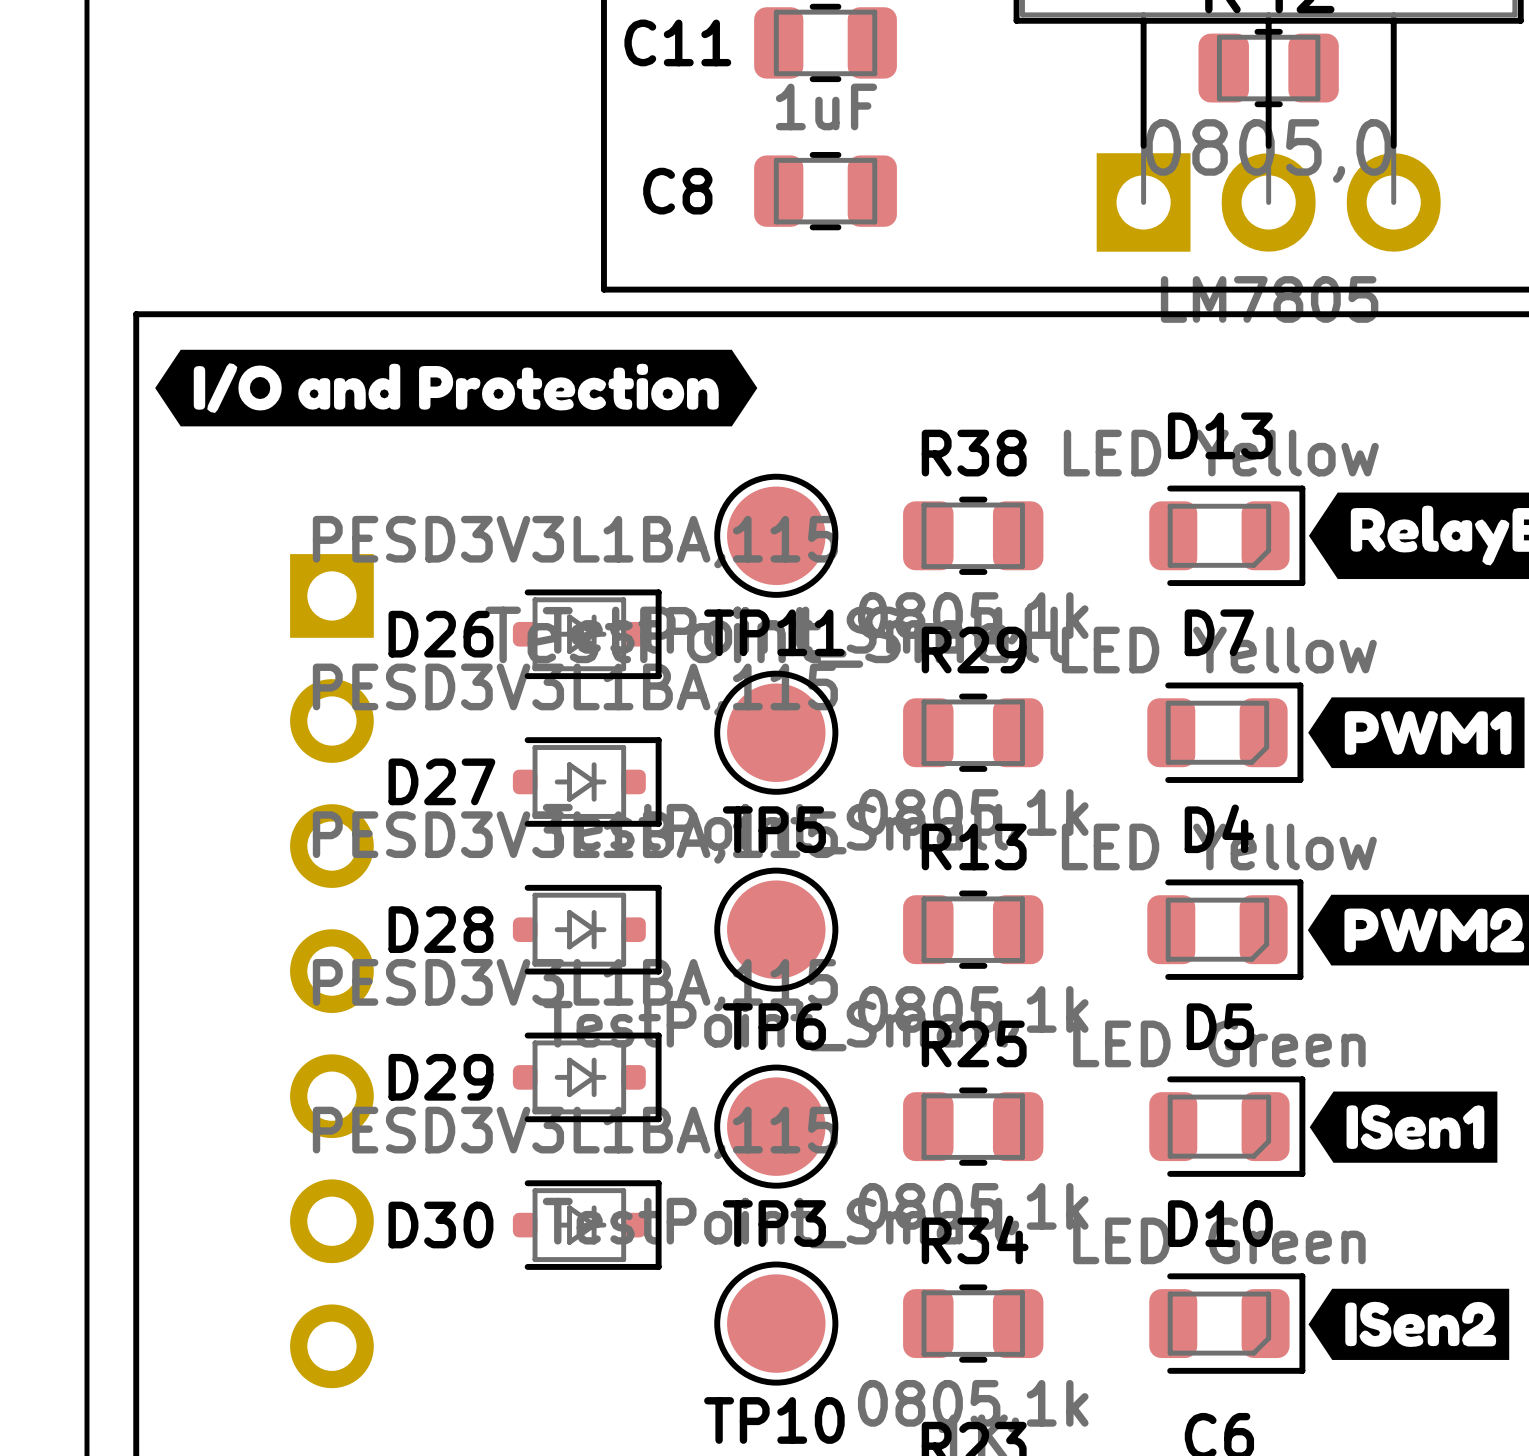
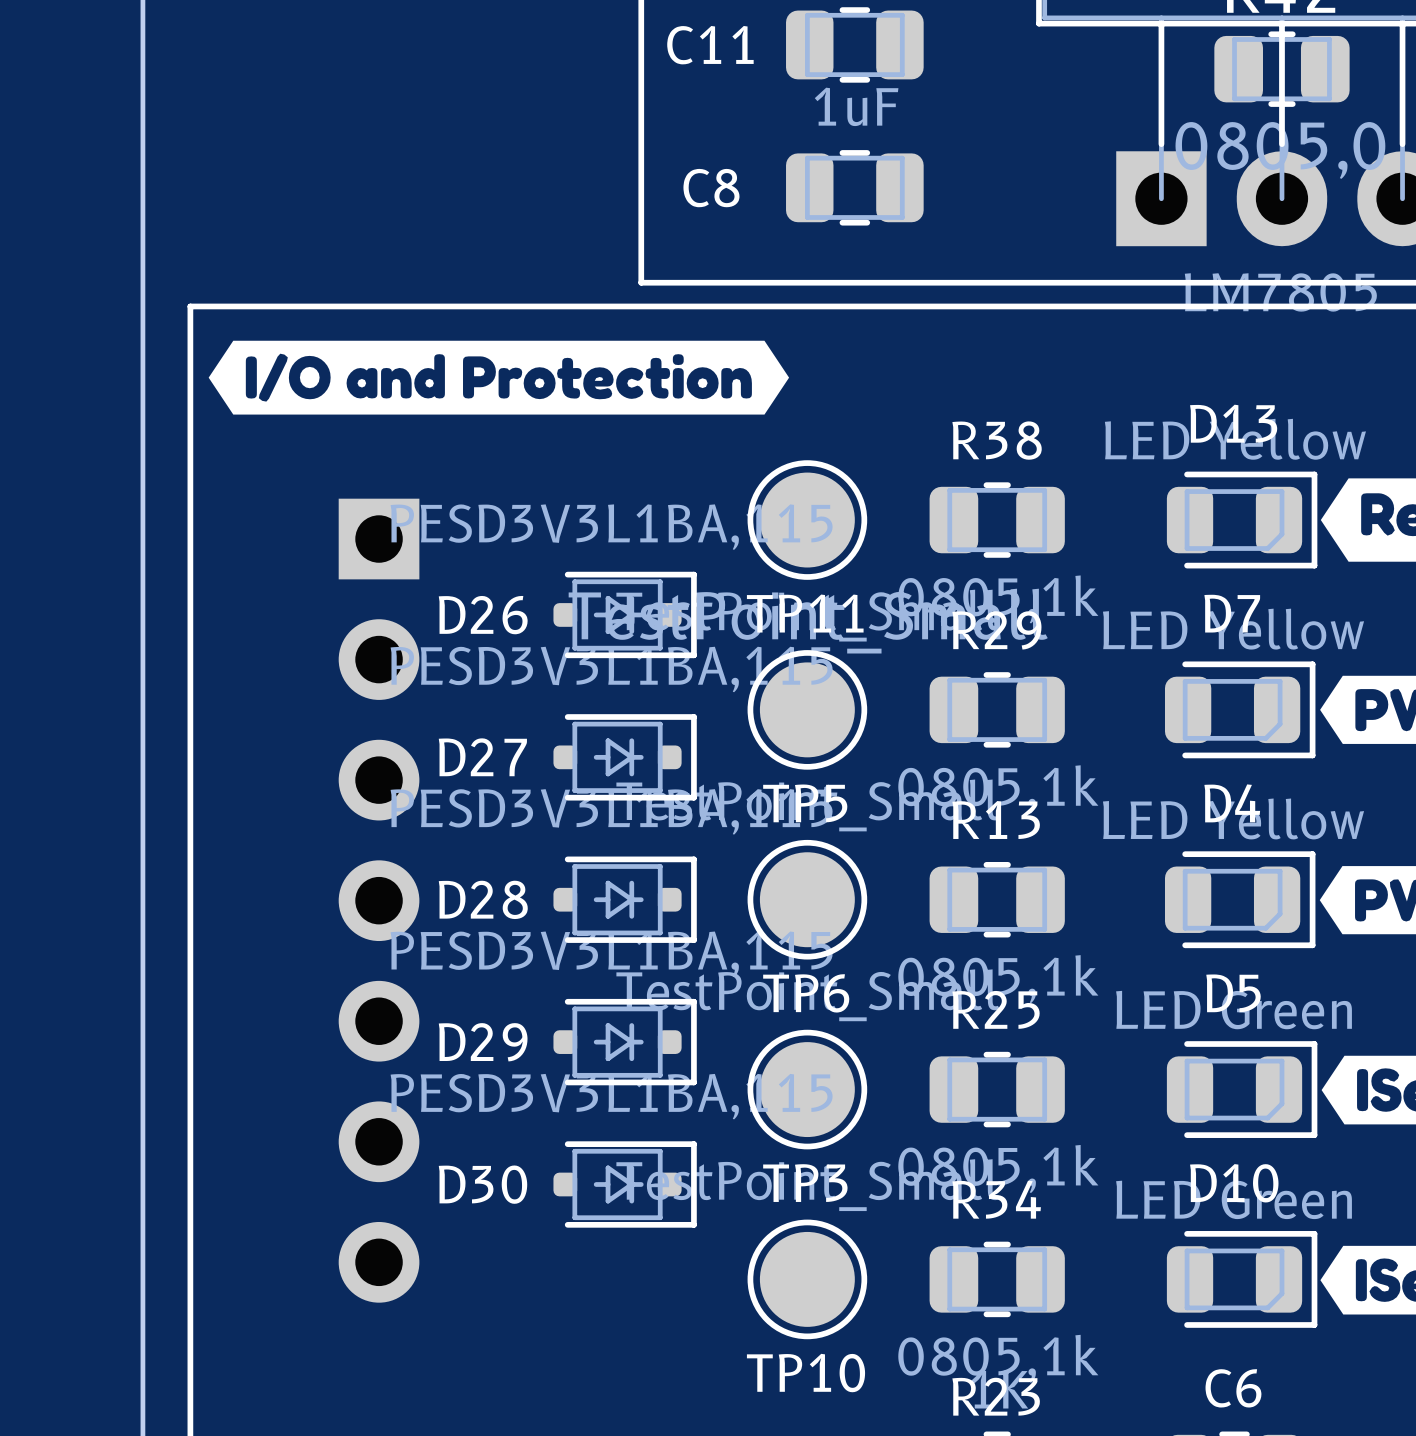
part position: (331, 971) -> (379, 900)

